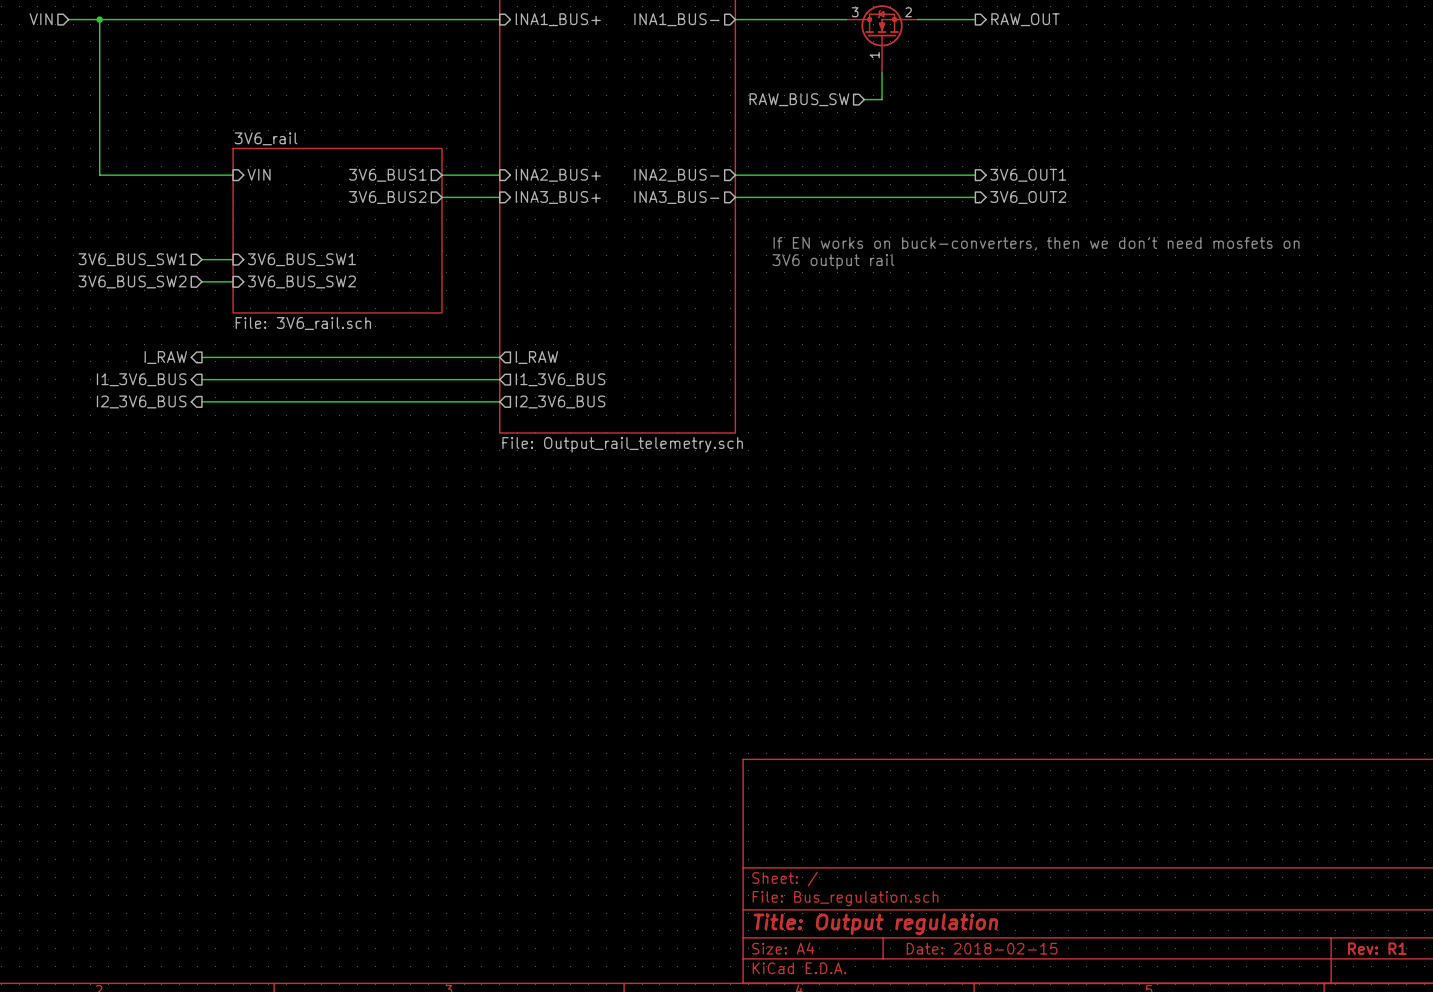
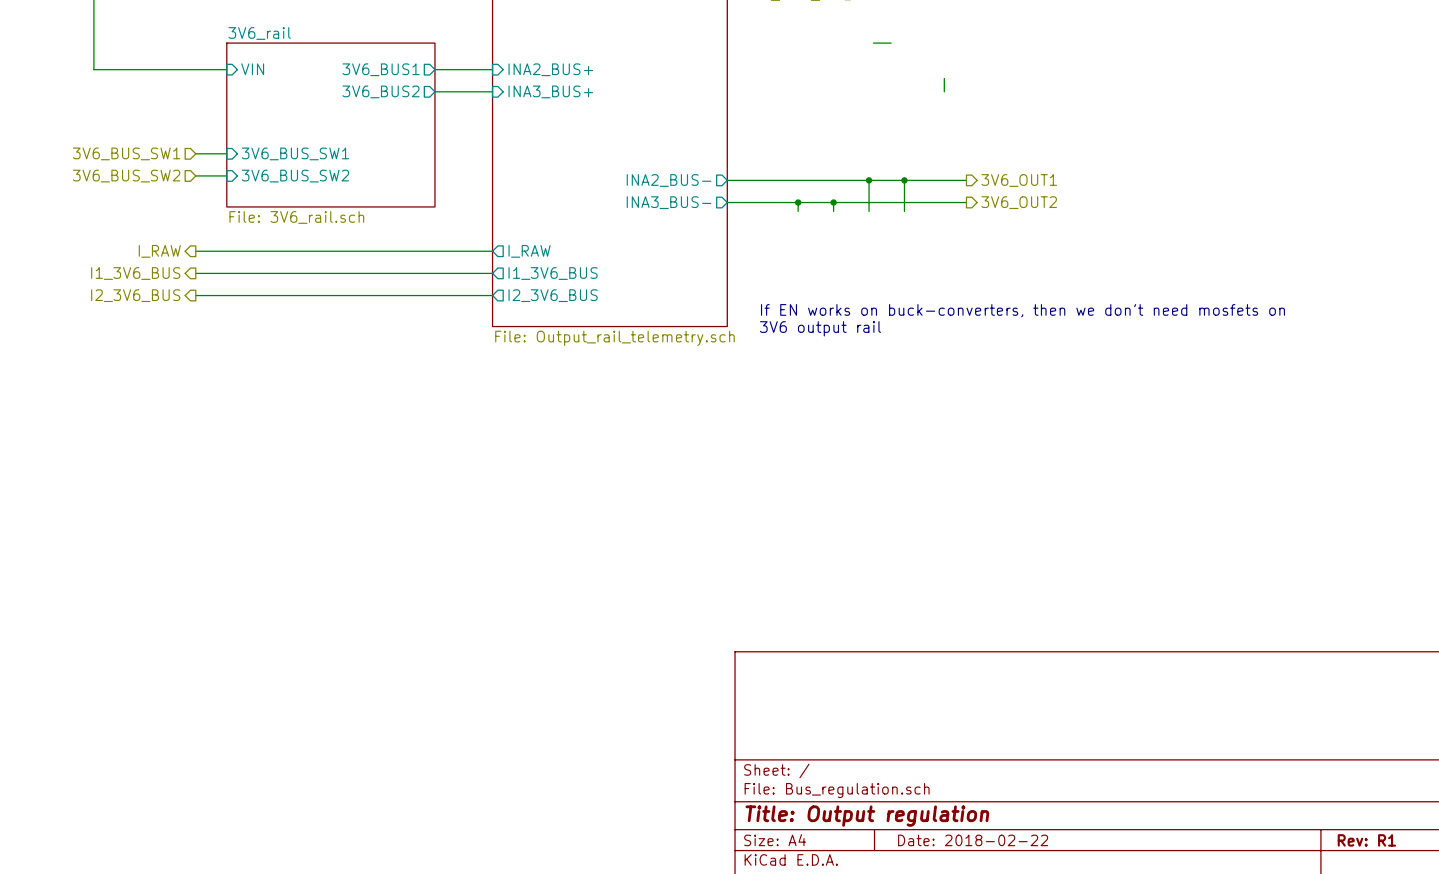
wire: none -> (873, 43) (891, 43)
sheet pin position: INA2_BUS- (676, 175) -> INA2_BUS- (669, 180)
wire: (735, 175) (975, 175) -> (727, 180) (966, 180)
hierarchical label position: 3V6_OUT1 (1028, 175) -> 3V6_OUT1 (1019, 180)
wire: none -> (944, 78) (944, 91)
sheet pin position: INA3_BUS- (676, 197) -> INA3_BUS- (669, 202)
wire: (735, 197) (975, 197) -> (727, 202) (966, 202)
hierarchical label position: 3V6_OUT2 (1028, 197) -> 3V6_OUT2 (1019, 202)
text position: If EN works on buck-converters, then we don't need mosfets on (1036, 243) -> If EN works on buck-converters, then we don't need mosfets on (1022, 310)
text position: 3V6 output rail (833, 261) -> 3V6 output rail (820, 328)
wire: none -> (869, 180) (869, 211)
junction: none -> (869, 180)
wire: none -> (904, 180) (904, 211)
junction: none -> (904, 180)
wire: none -> (798, 202) (798, 211)
junction: none -> (798, 202)
wire: none -> (833, 202) (833, 211)
junction: none -> (833, 202)
title block: Date: 2018-02-15 (982, 948) -> Date: 2018-02-22 (973, 840)

